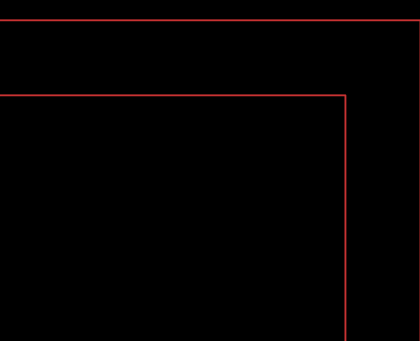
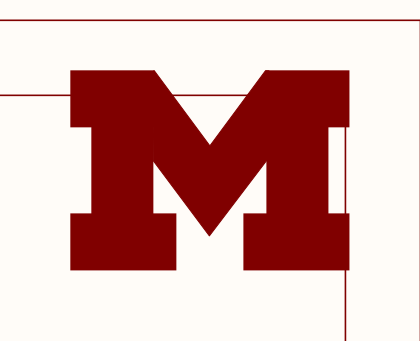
part: none -> (209, 170)

